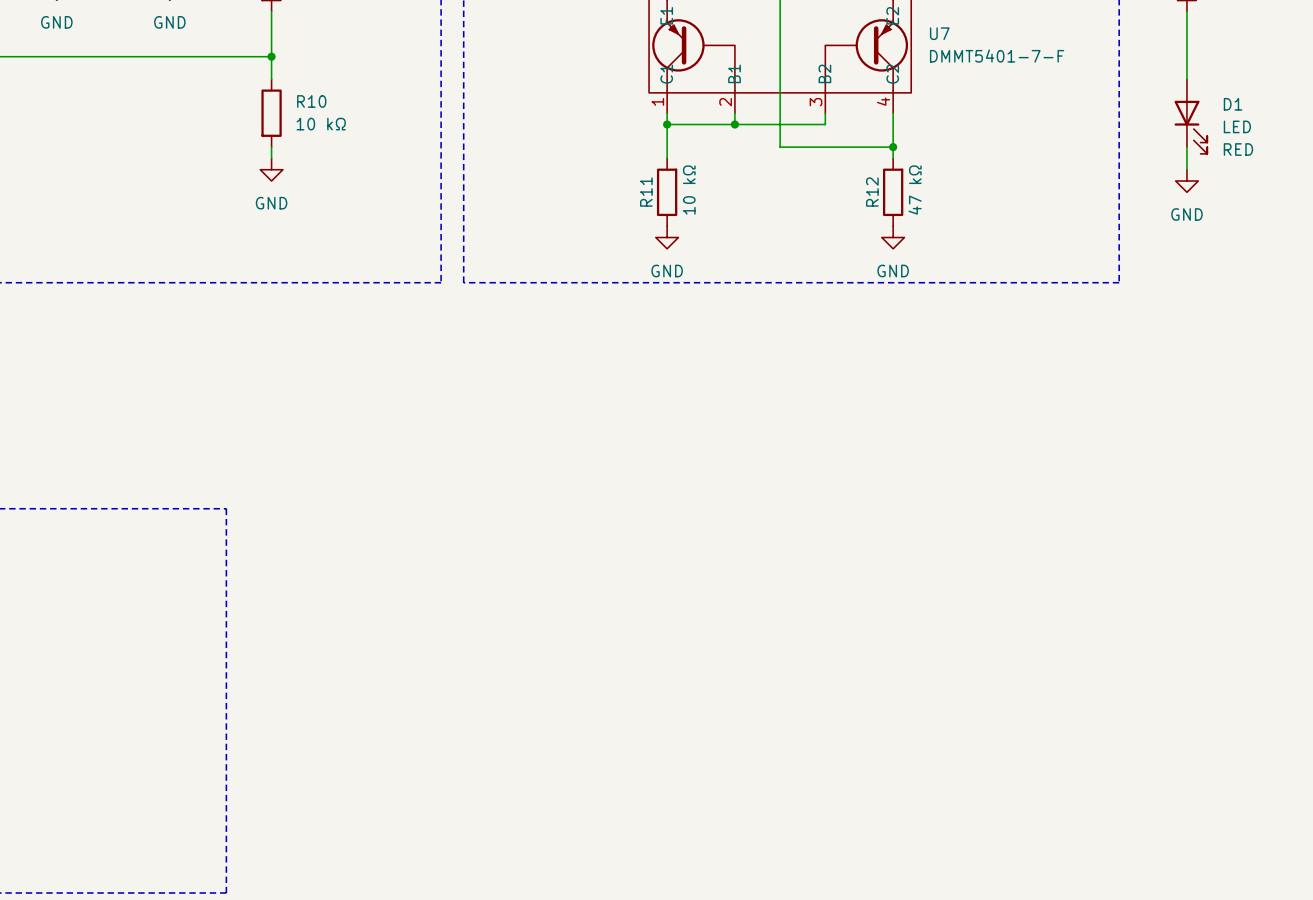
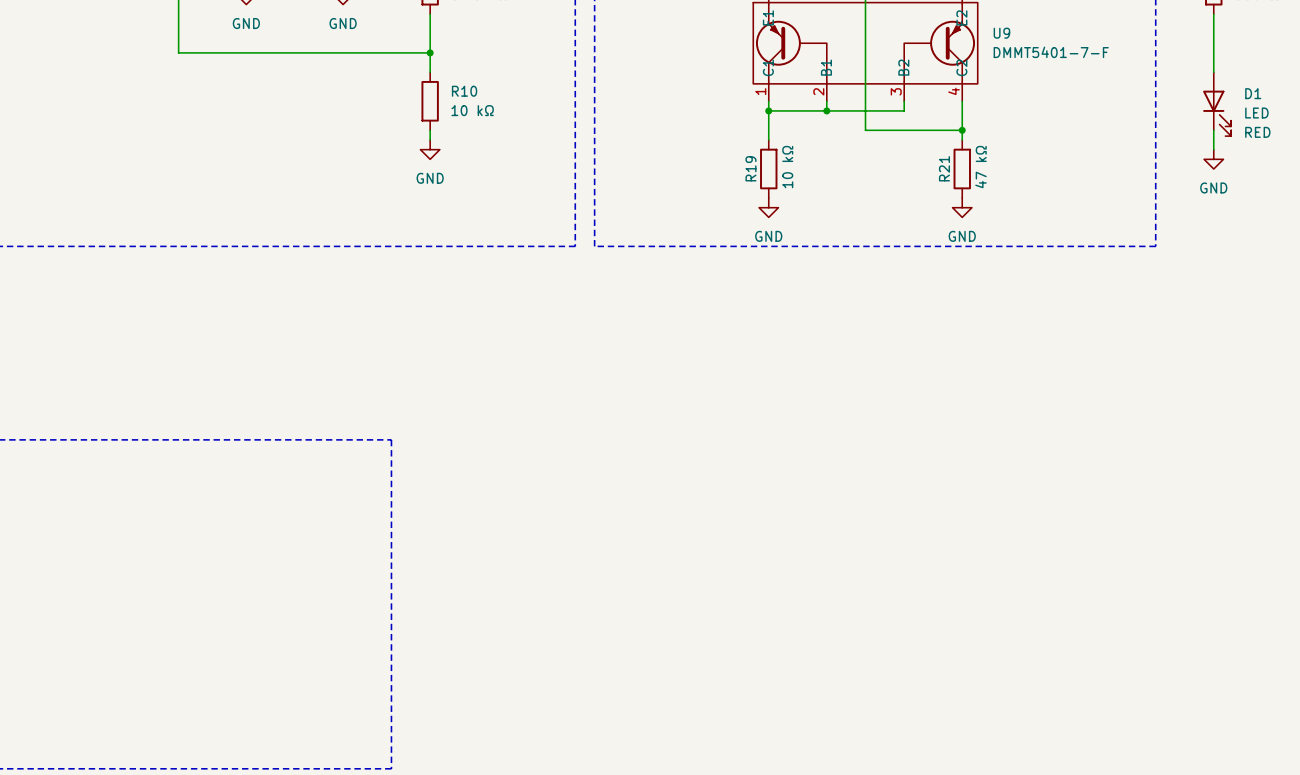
U7 name: U7 (939, 33) -> U9 (1001, 33)
R11 name: R11 (646, 192) -> R19 (750, 168)
R12 name: R12 (872, 192) -> R21 (944, 168)

